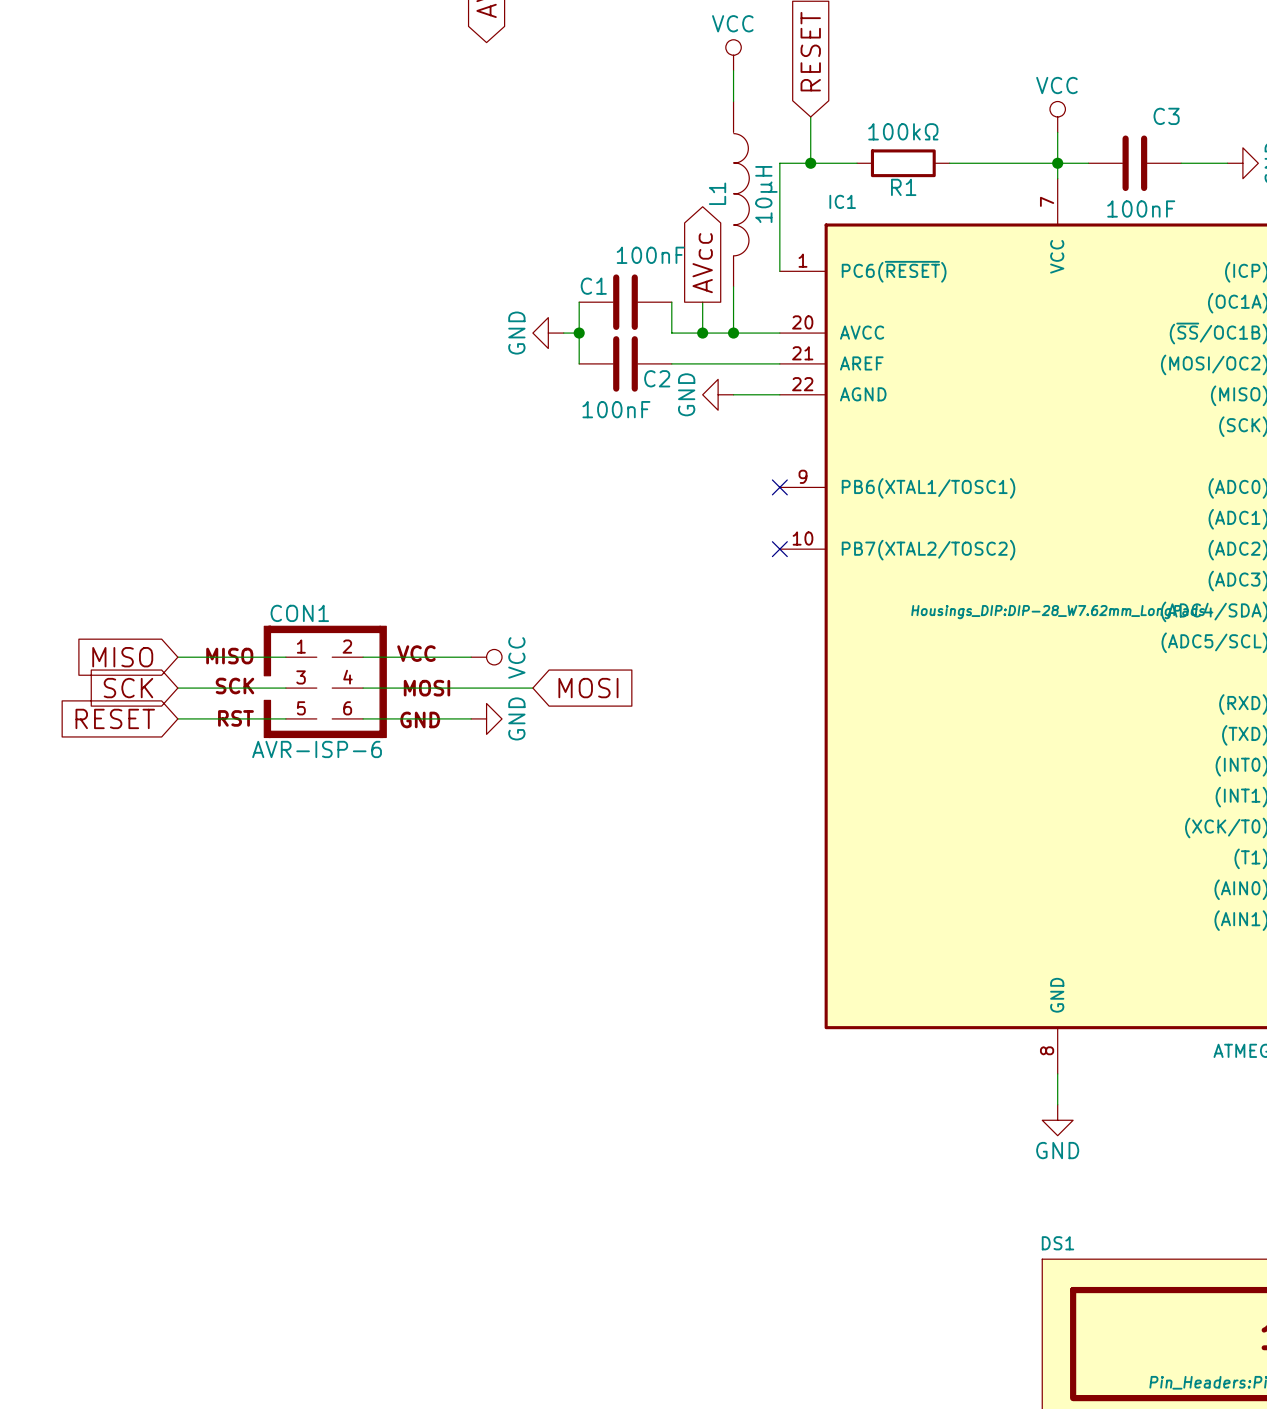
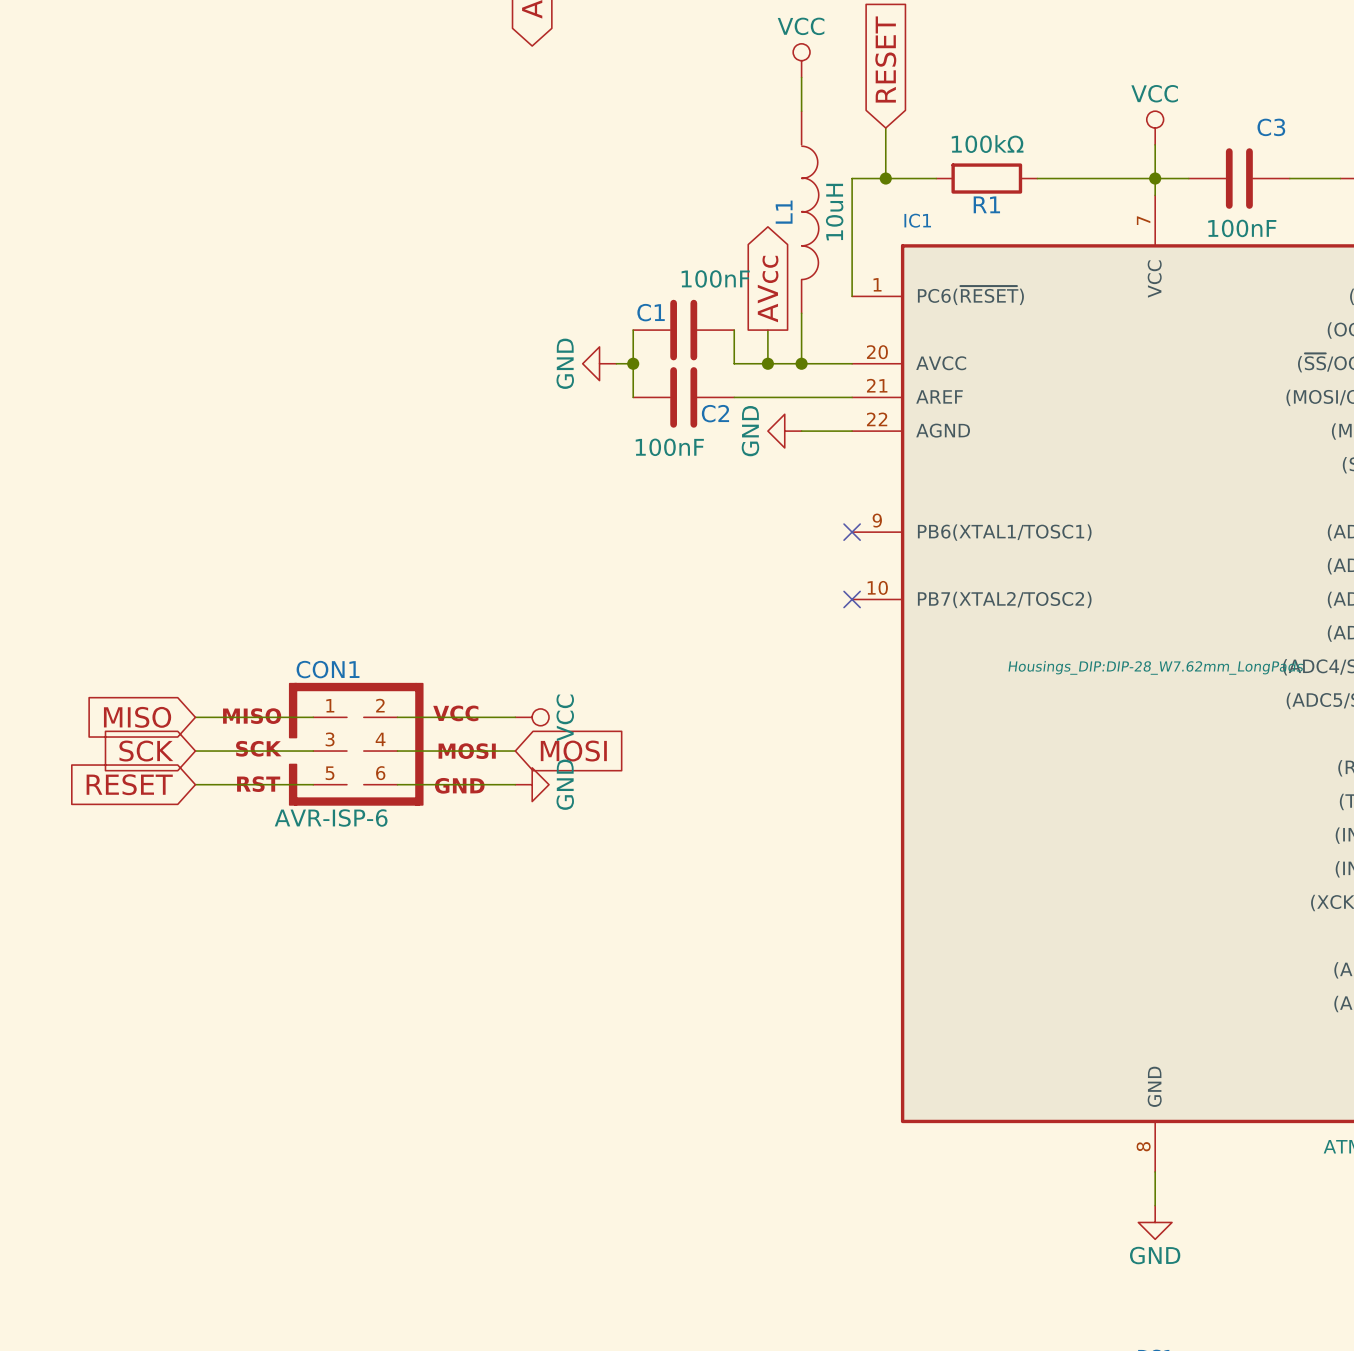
L1 value: 10µH (766, 194) -> 10uH (834, 212)
wire: (471, 688) (532, 688) -> none
global label position: MOSI (588, 688) -> MOSI (573, 751)

